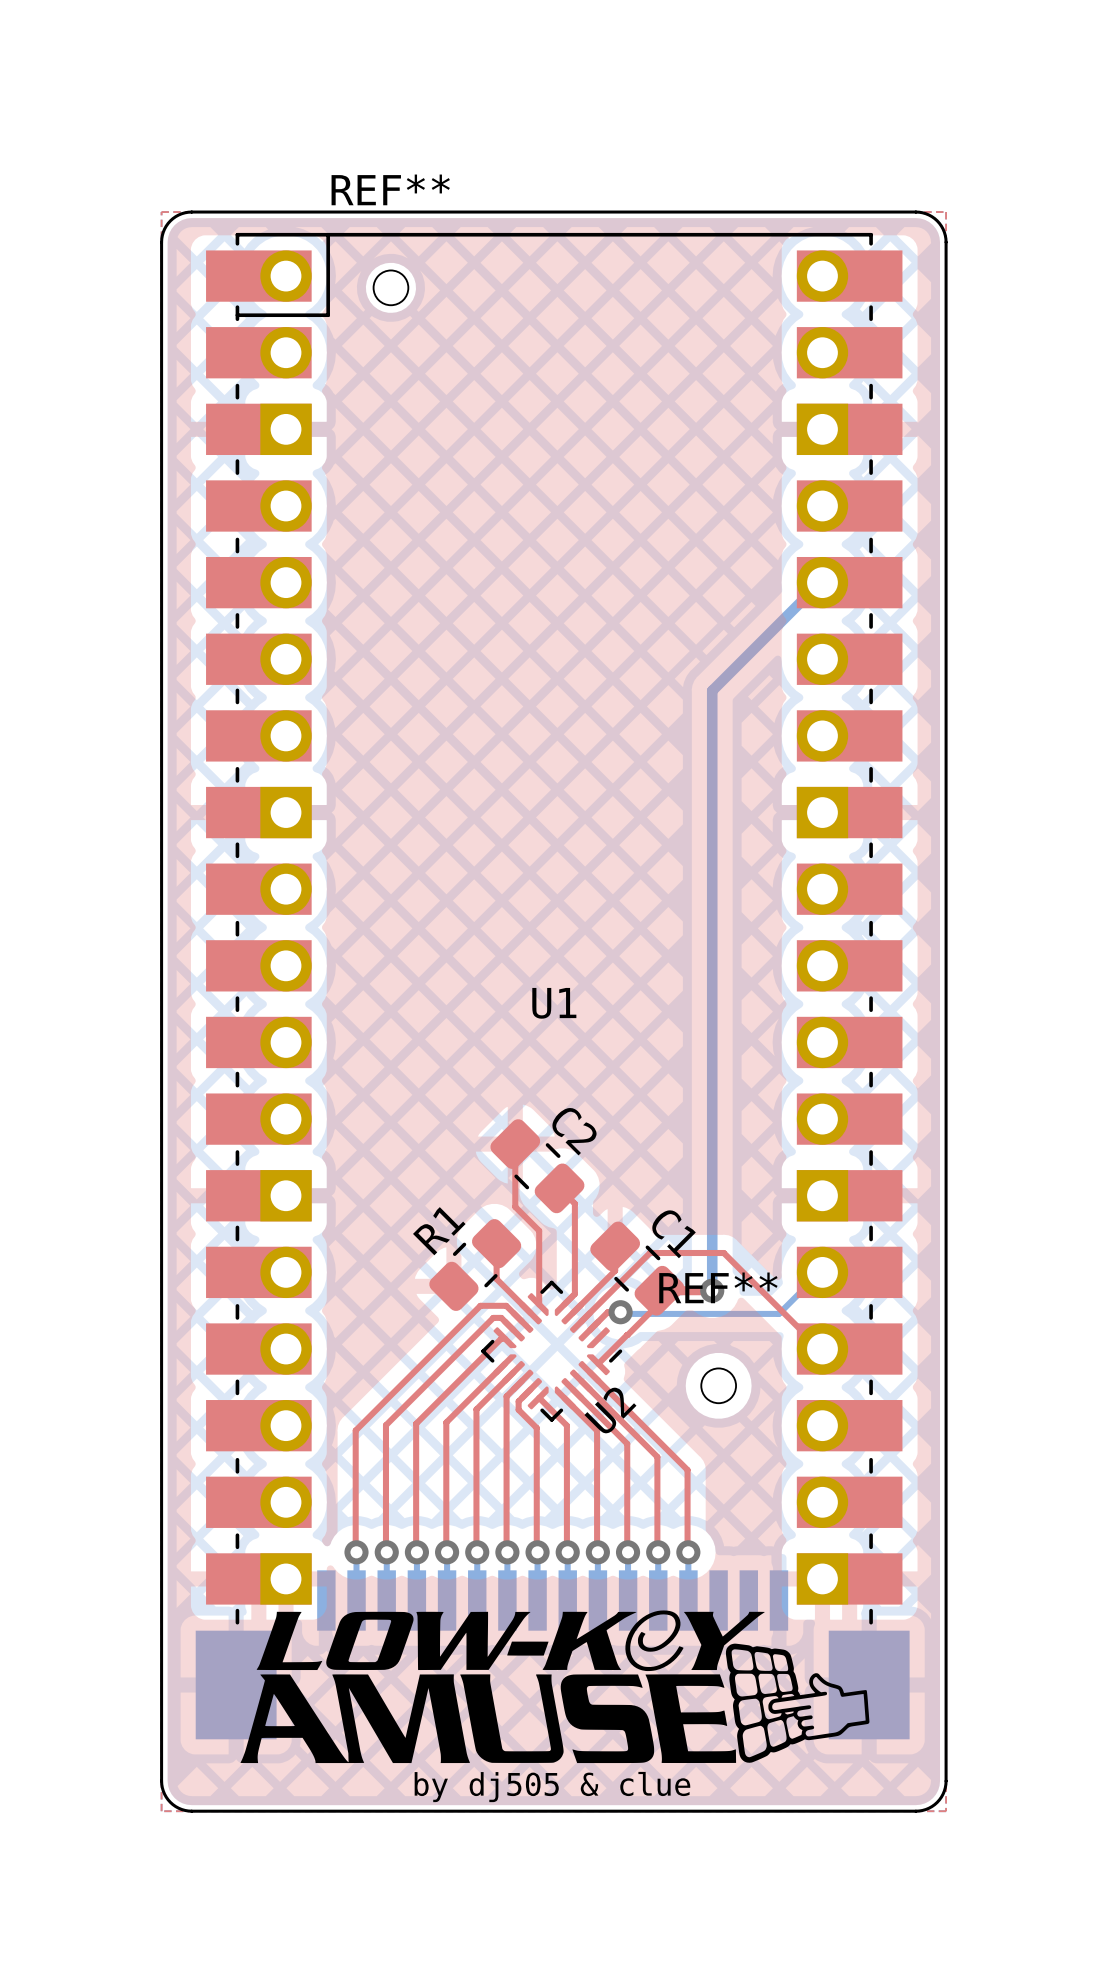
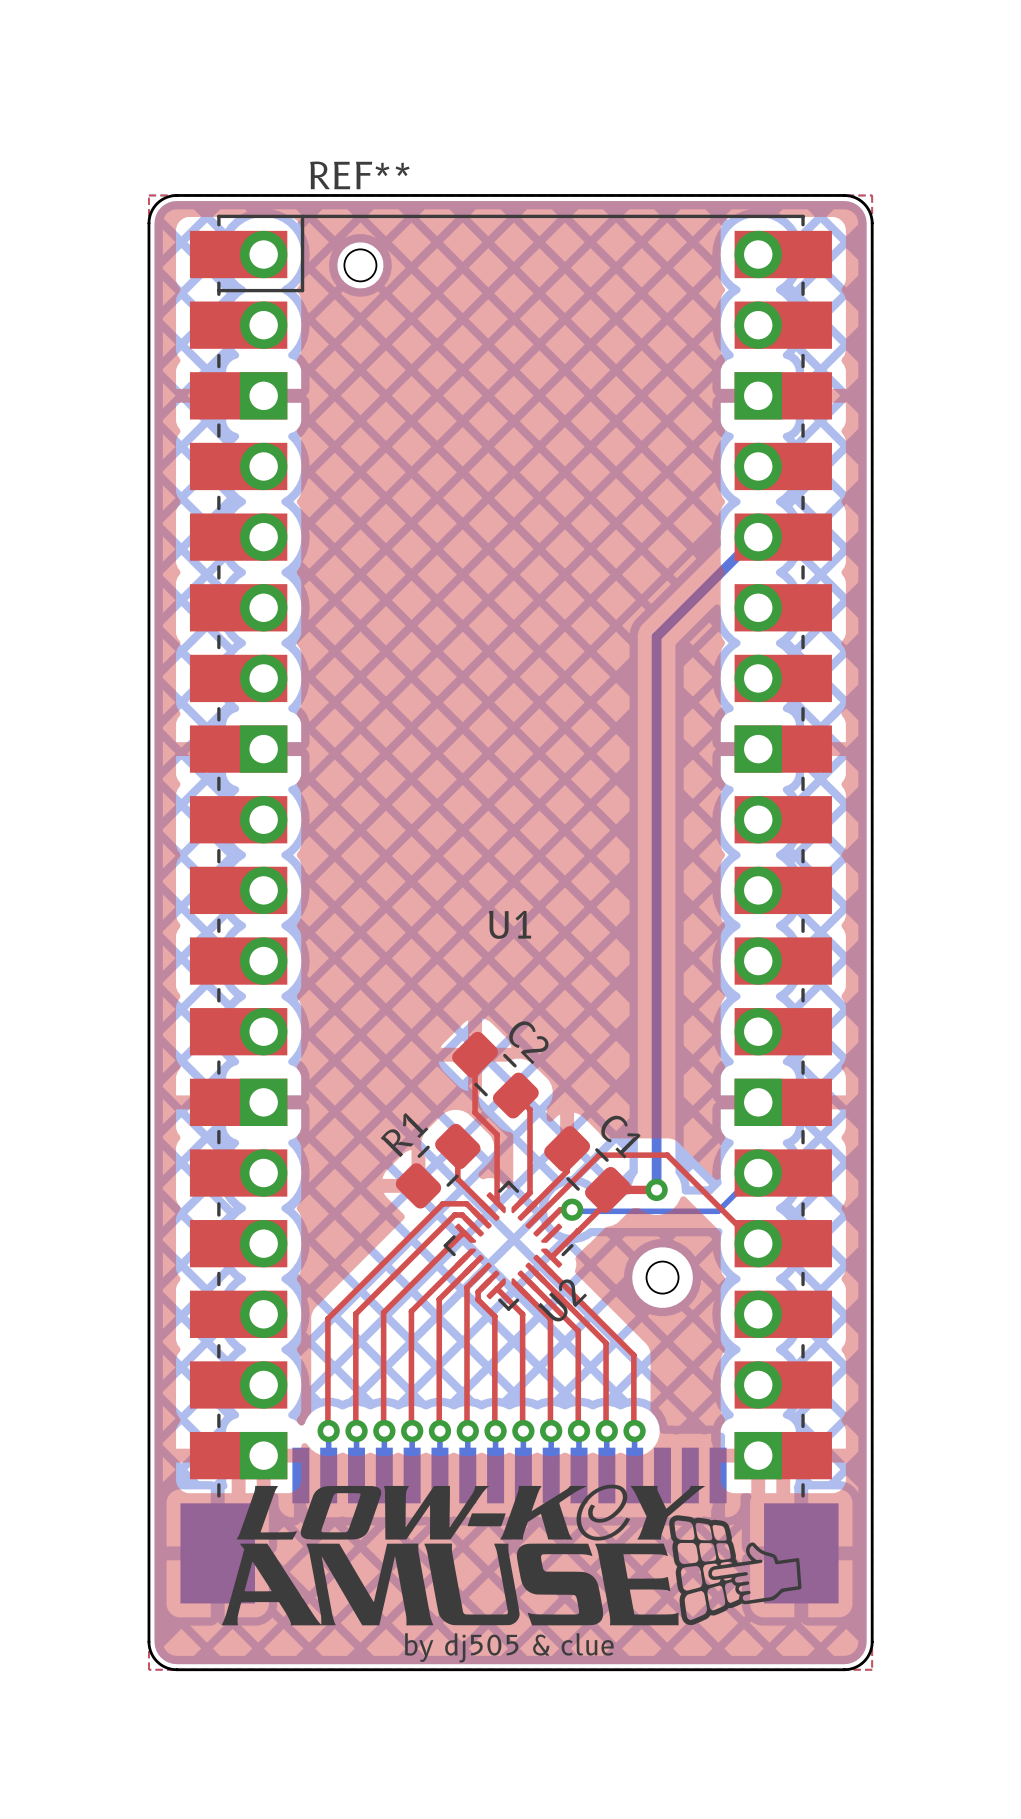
REF** name: REF** (718, 1287) -> none

